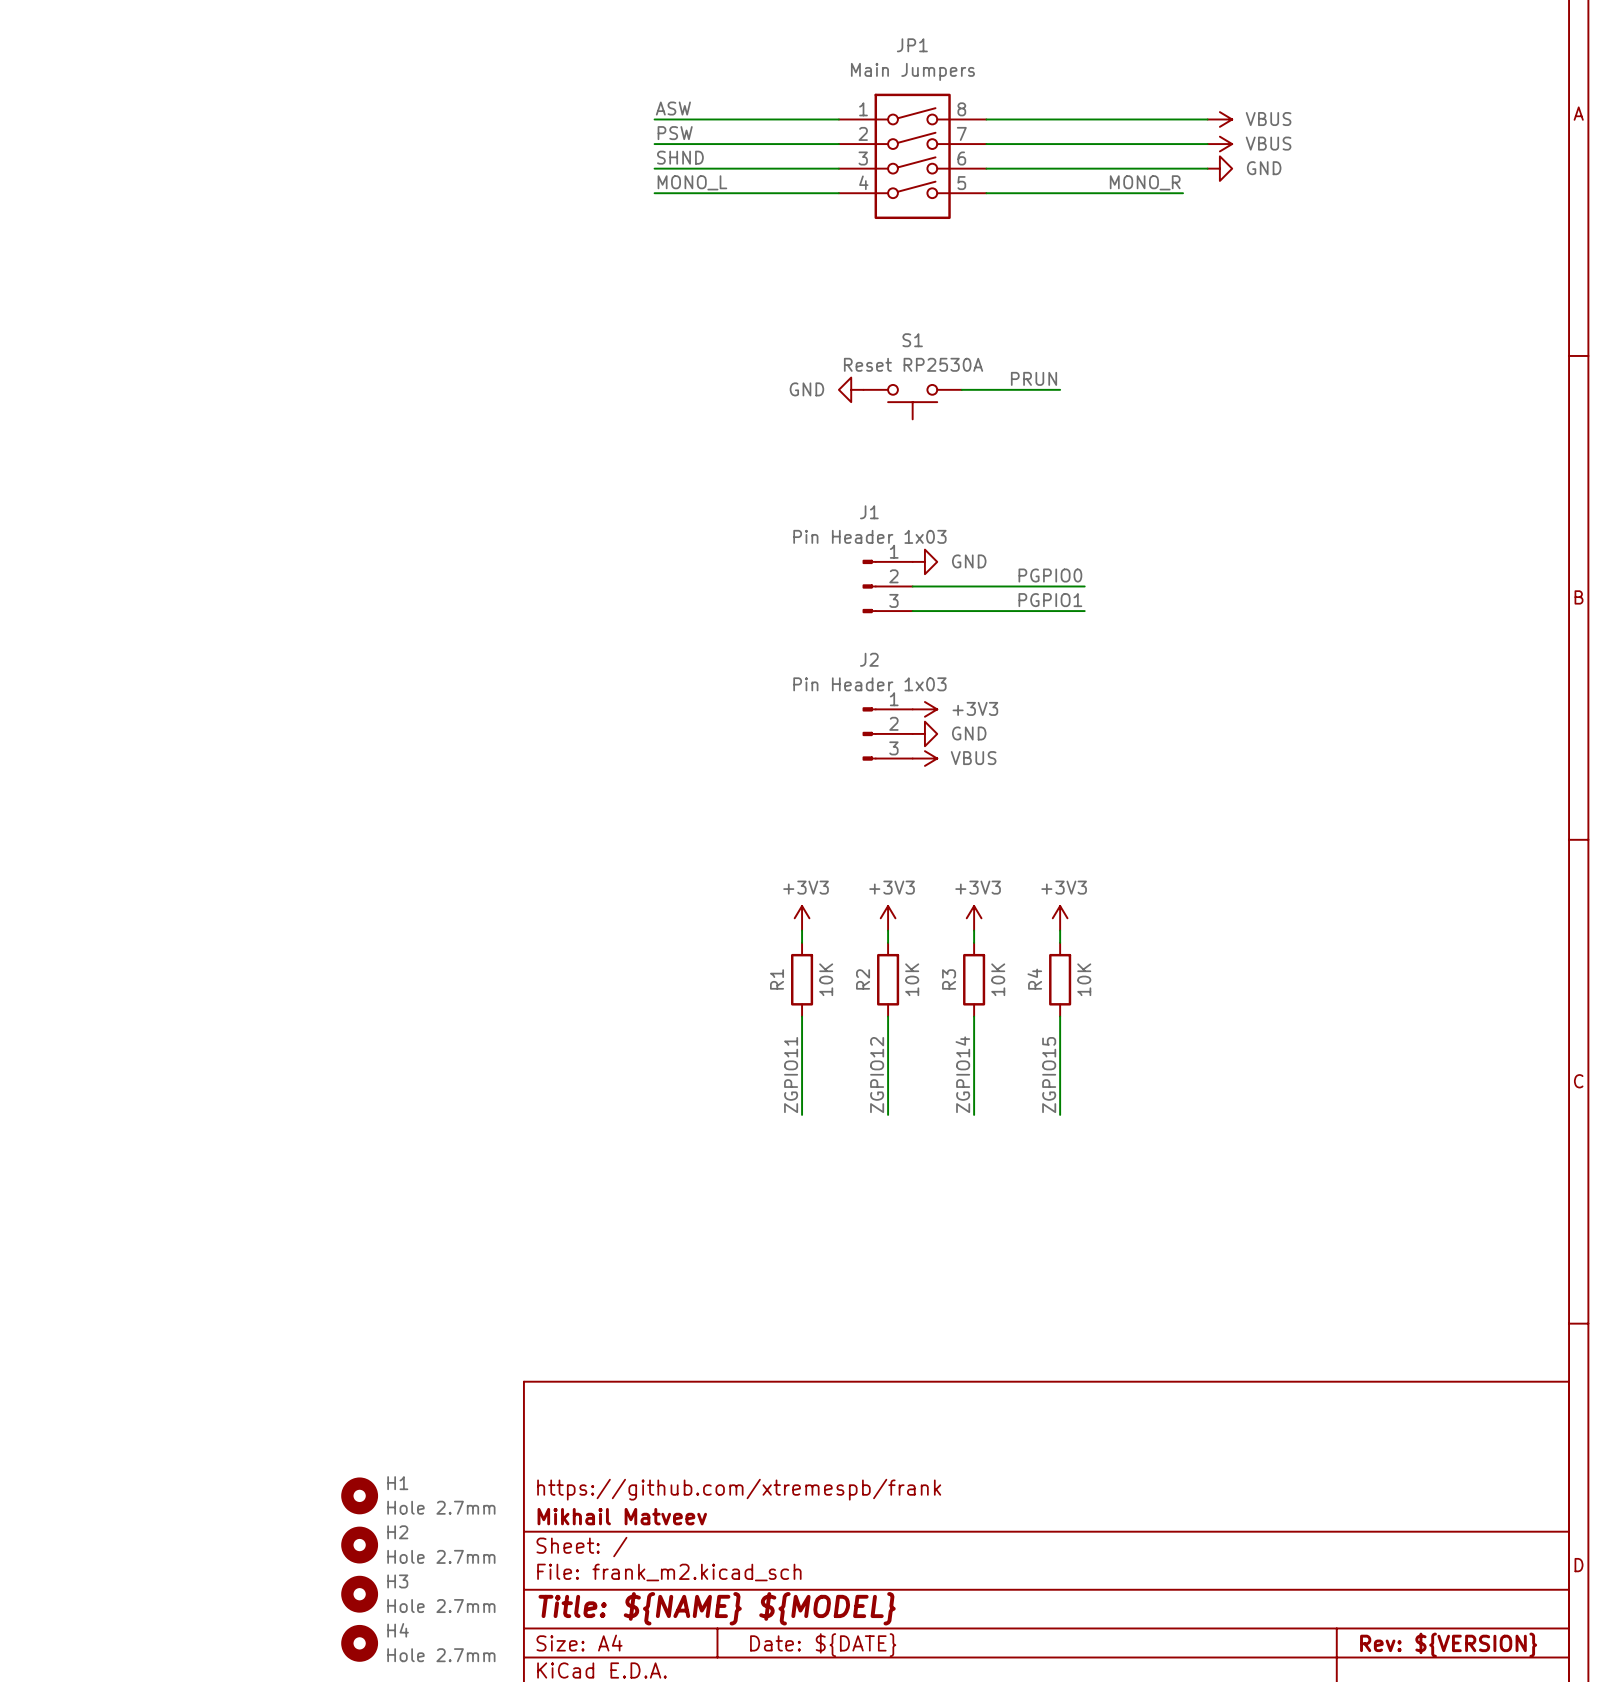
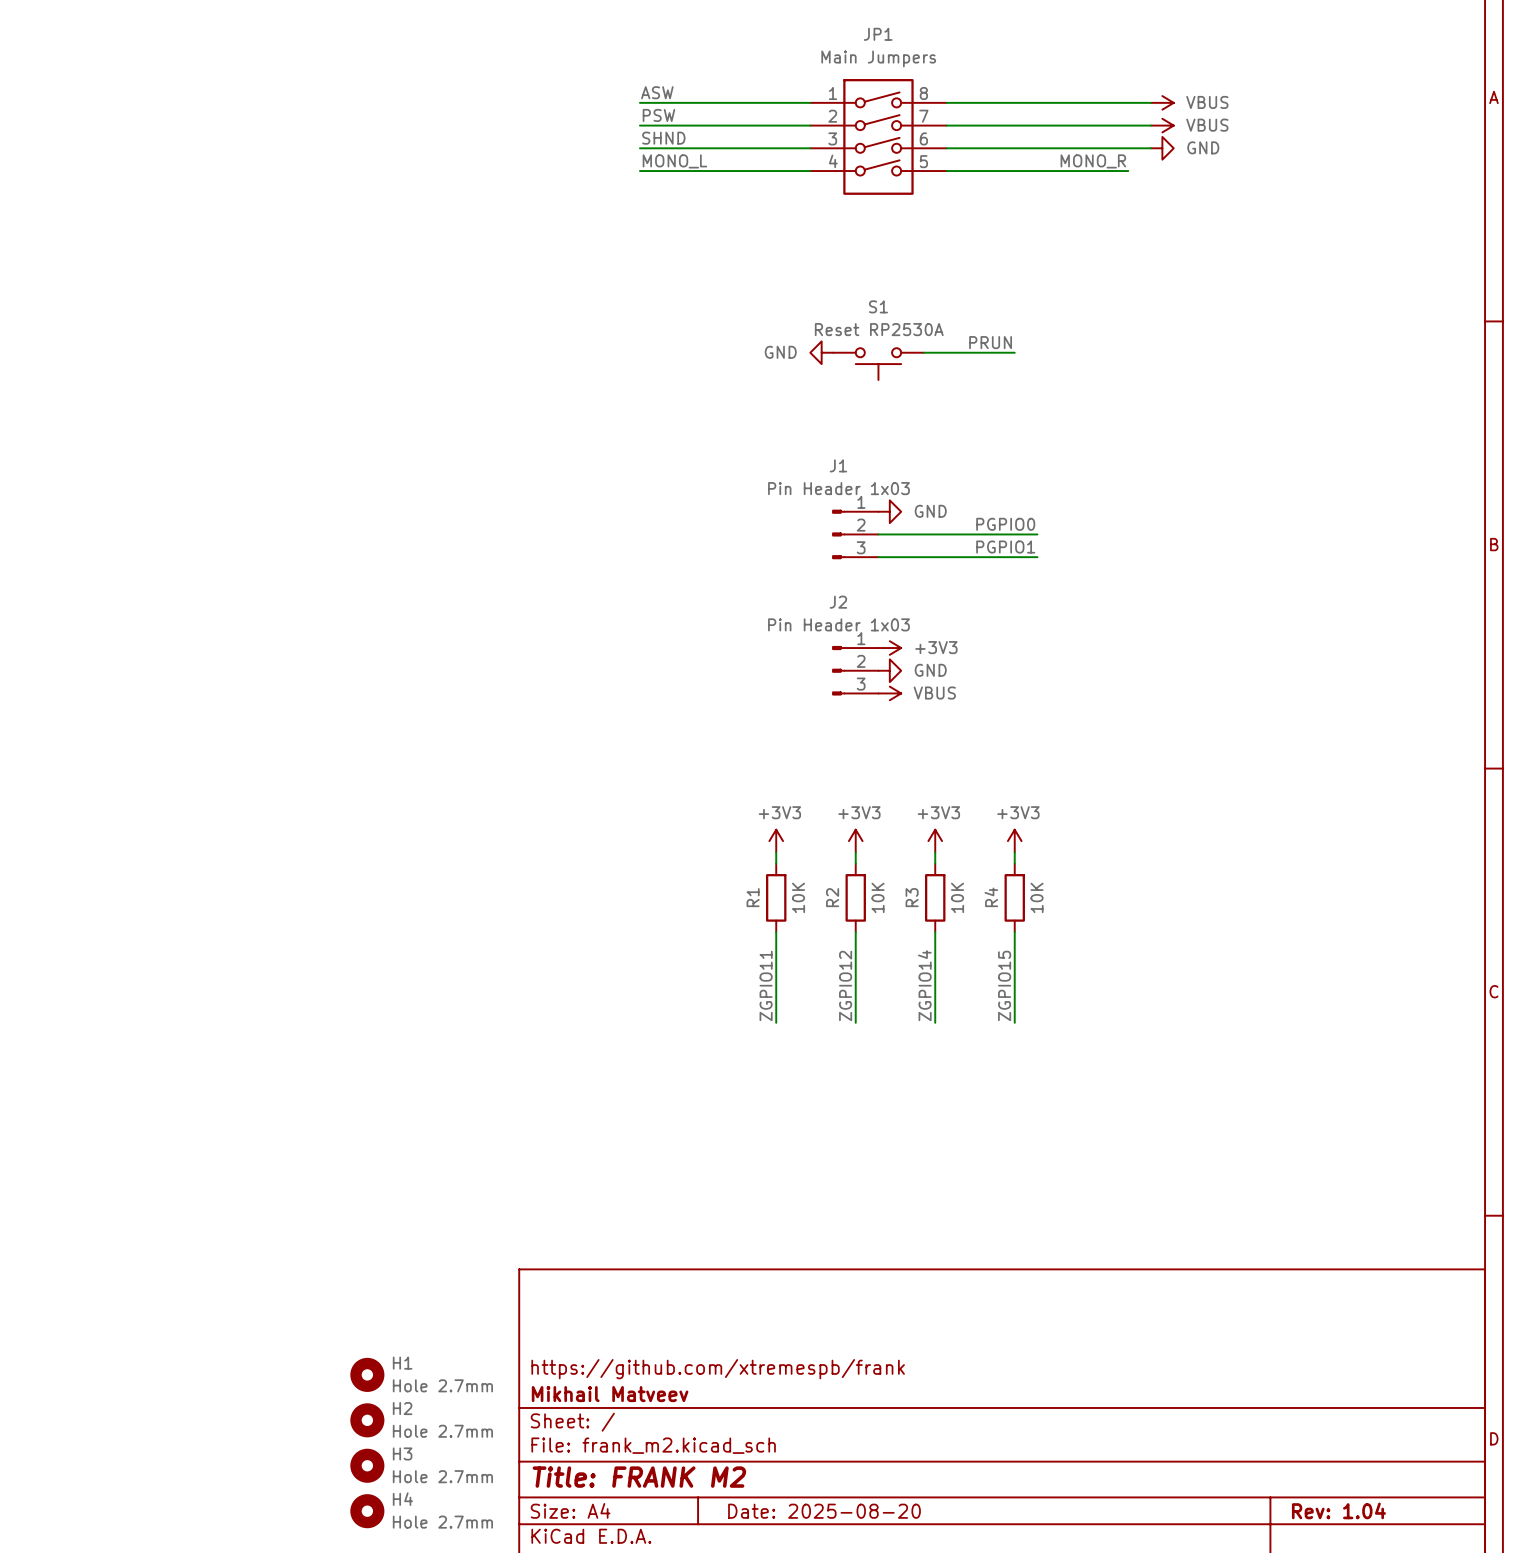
title block: Title: ${NAME} ${MODEL} (717, 1608) -> Title: FRANK M2 (639, 1477)
title block: Date: ${DATE} (823, 1645) -> Date: 2025-08-20 (824, 1511)
title block: Rev: ${VERSION} (1448, 1645) -> Rev: 1.04 (1338, 1510)

